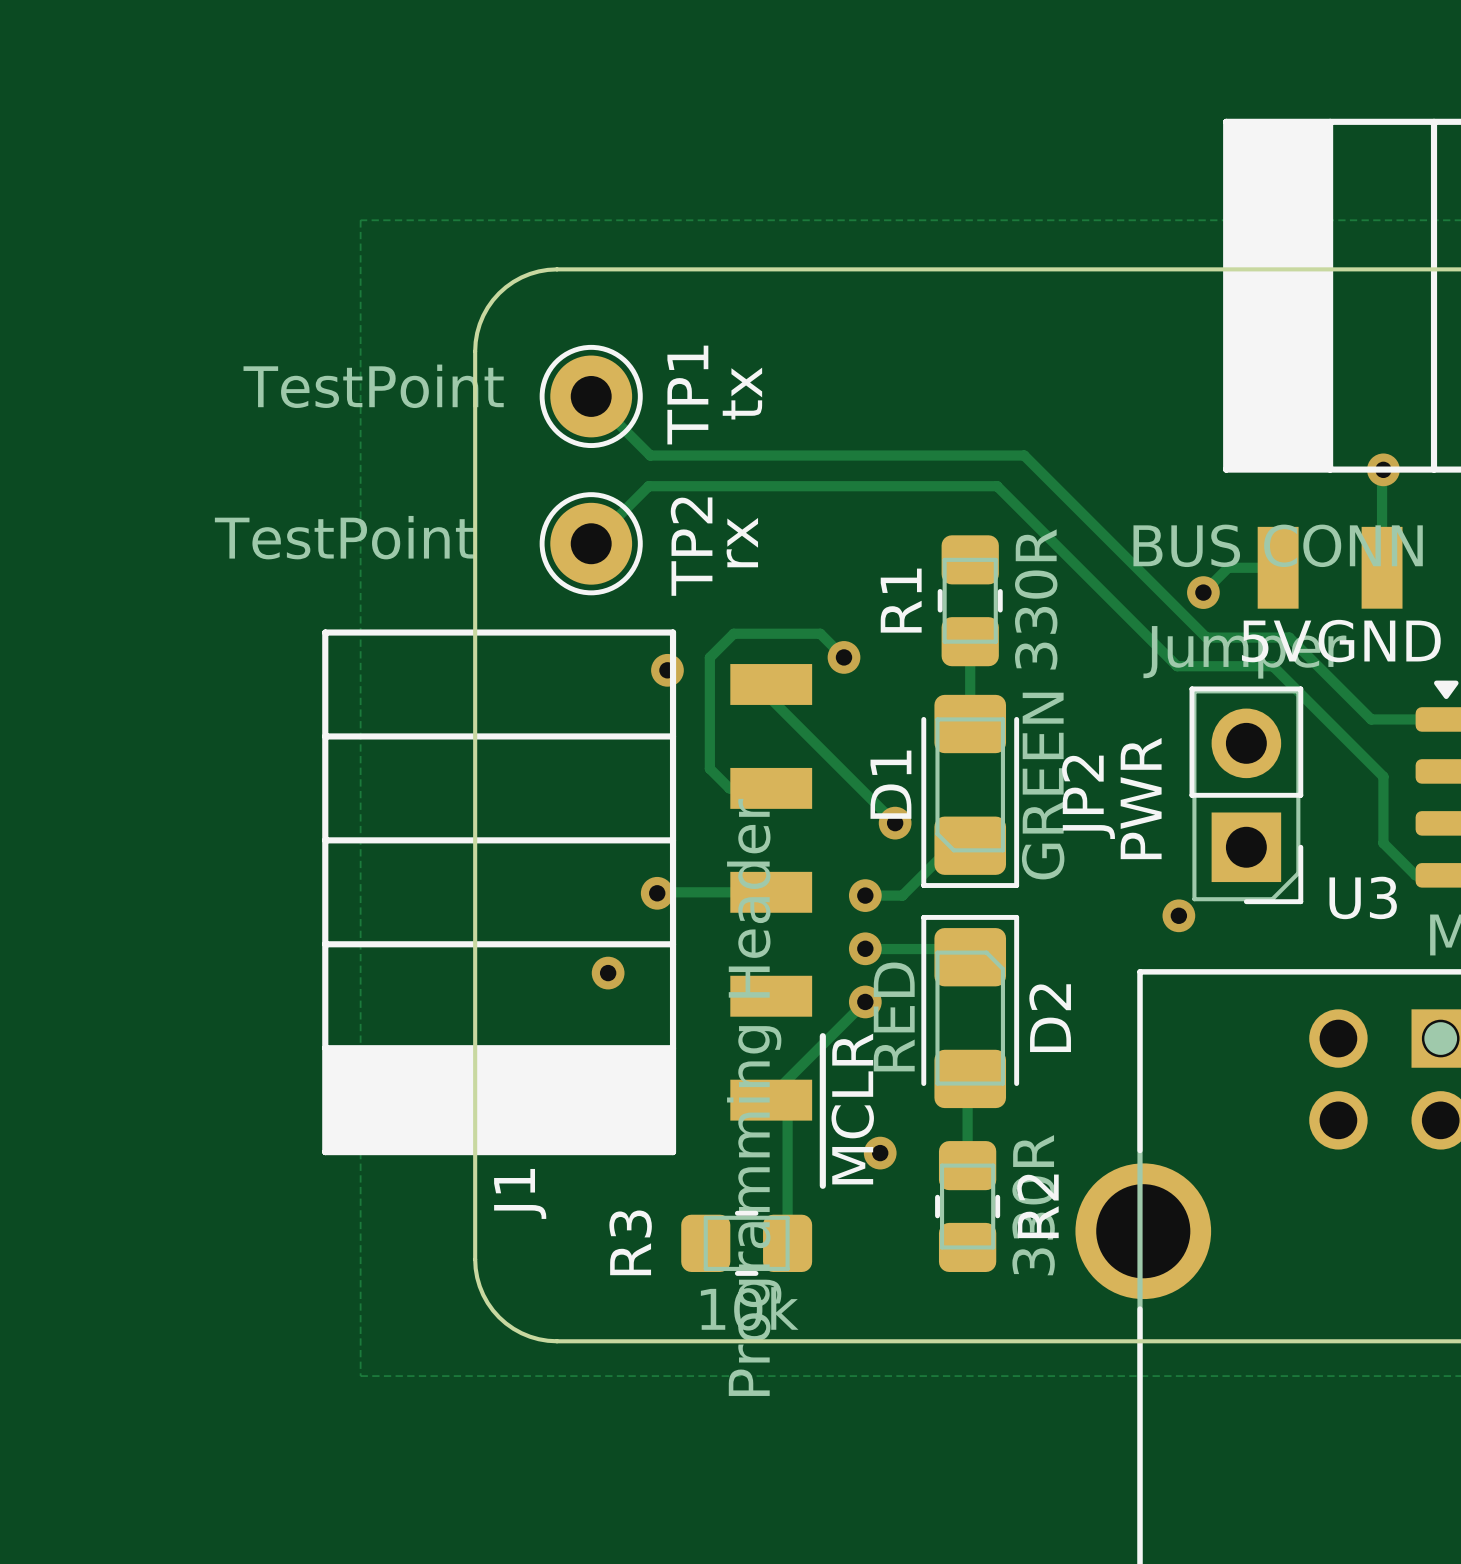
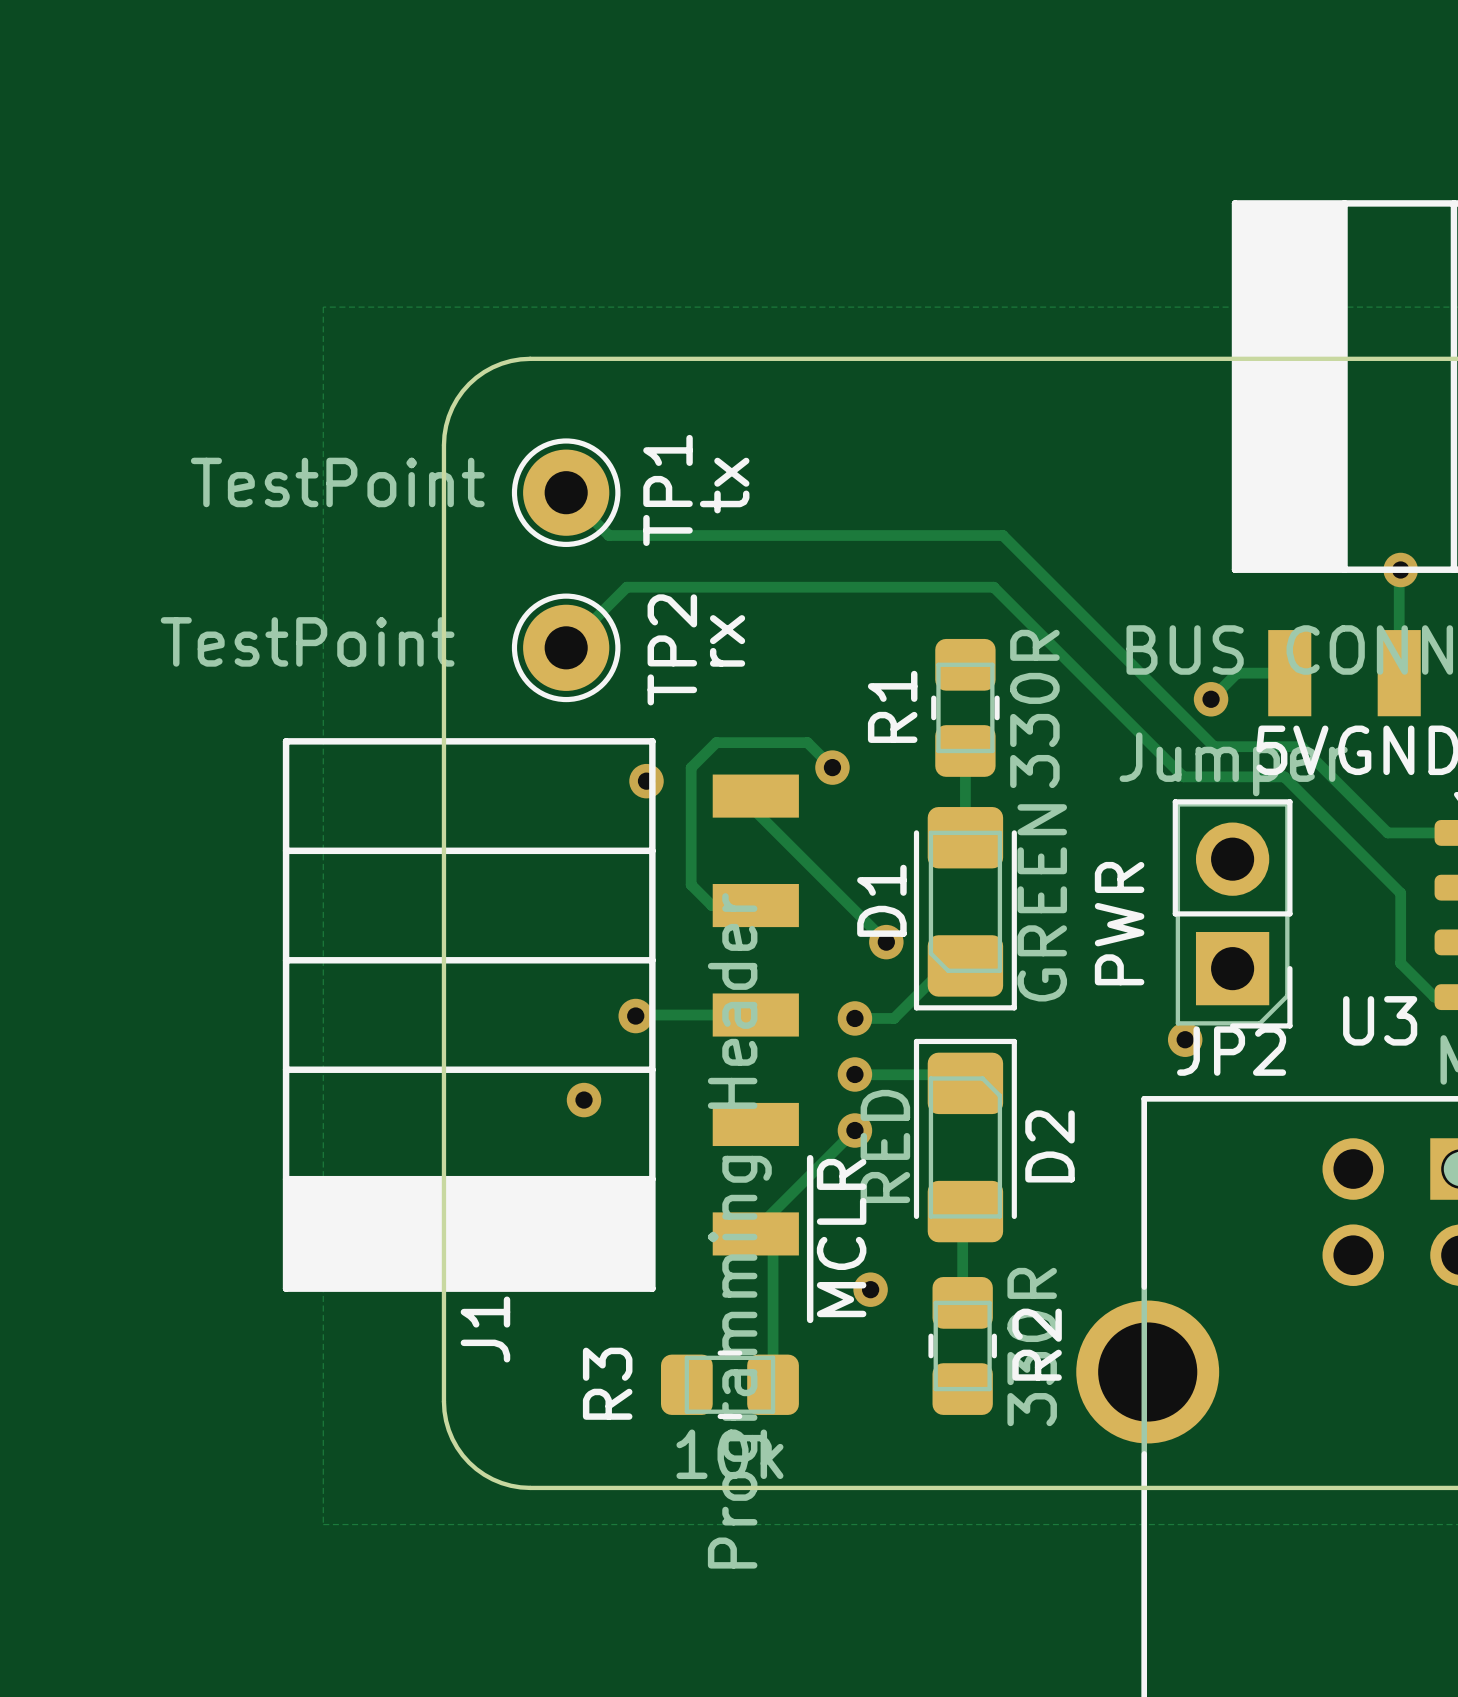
track: (631, 437) (650, 455) (1024, 455) -> (609, 535) (1002, 535) (1022, 554)
JP2 position: (1246, 795) -> (1232, 913)
JP2 name rotation: 0° (1088, 797) -> 90° clockwise (1231, 1051)
JP2 name position: JP2 (1088, 797) -> JP2 (1231, 1051)
text position: PWR (1141, 798) -> PWR (1119, 923)

